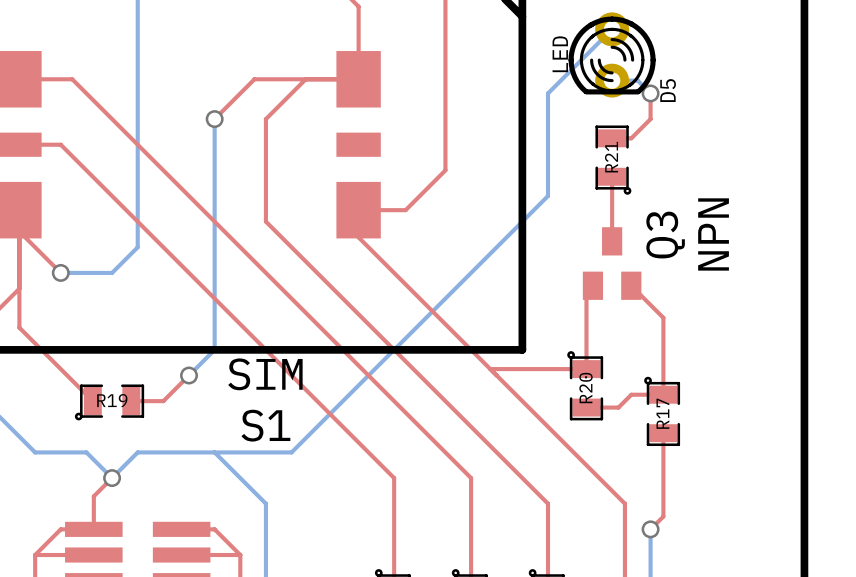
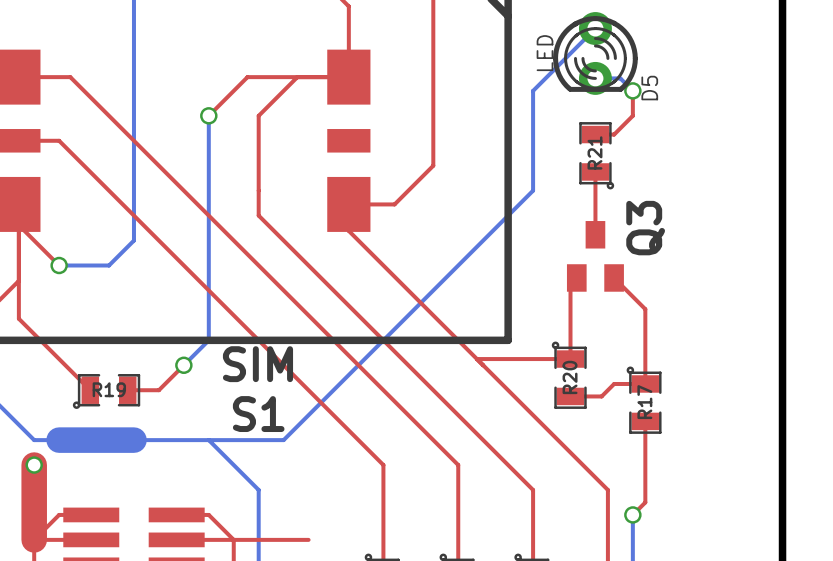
Q3 value: NPN (713, 234) -> none
bottom track width: thin (60, 452) (86, 452) -> thick (59, 440) (84, 440)
bottom track: (86, 452) (112, 478) (137, 452) -> (84, 440) (133, 440)
top track: none -> (34, 465) (34, 539)
top track: (112, 478) (93, 496) (93, 529) -> none
via position: (112, 478) -> (34, 465)
top track: none -> (233, 539) (308, 539)

